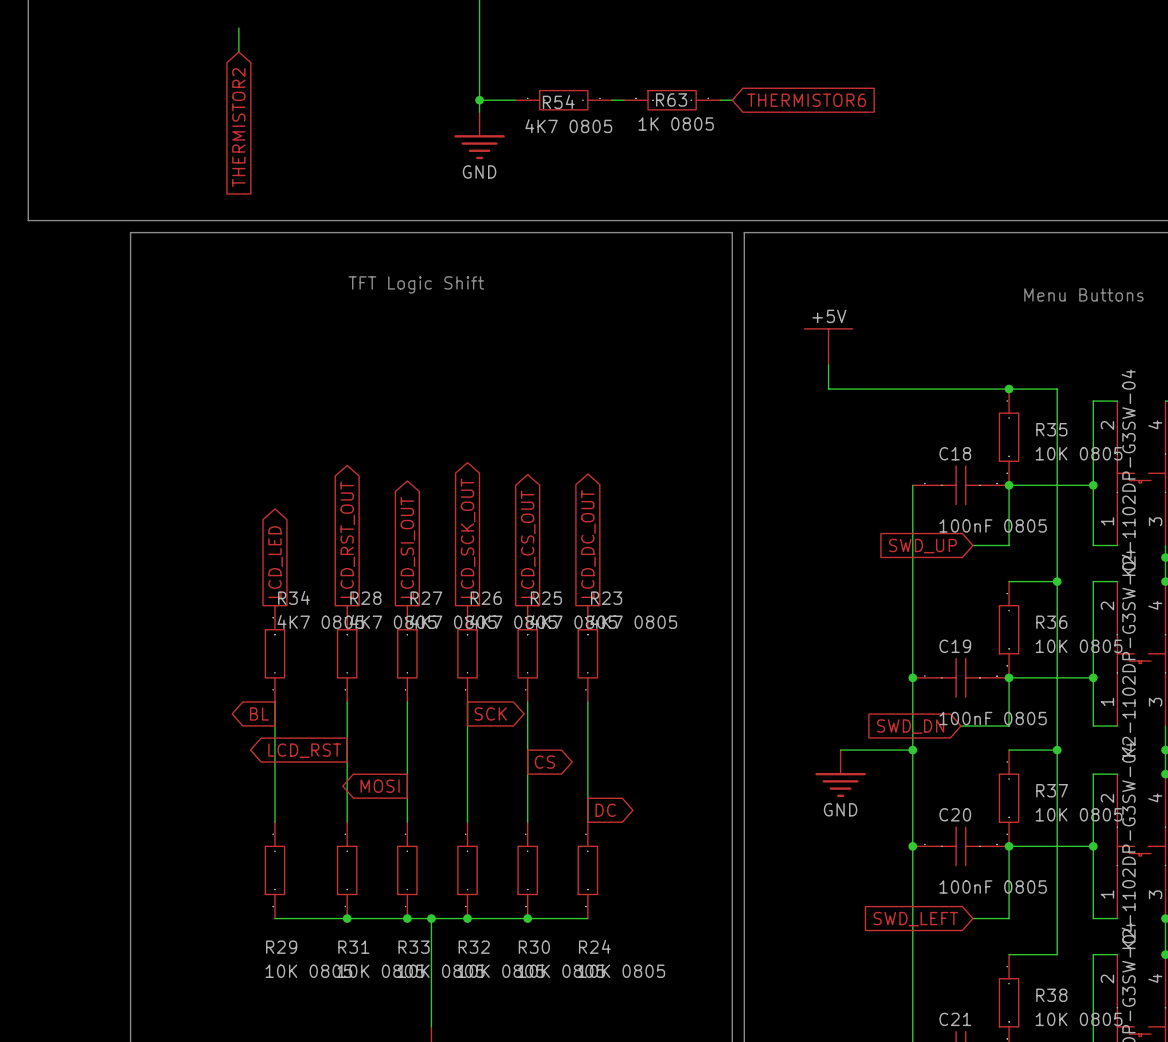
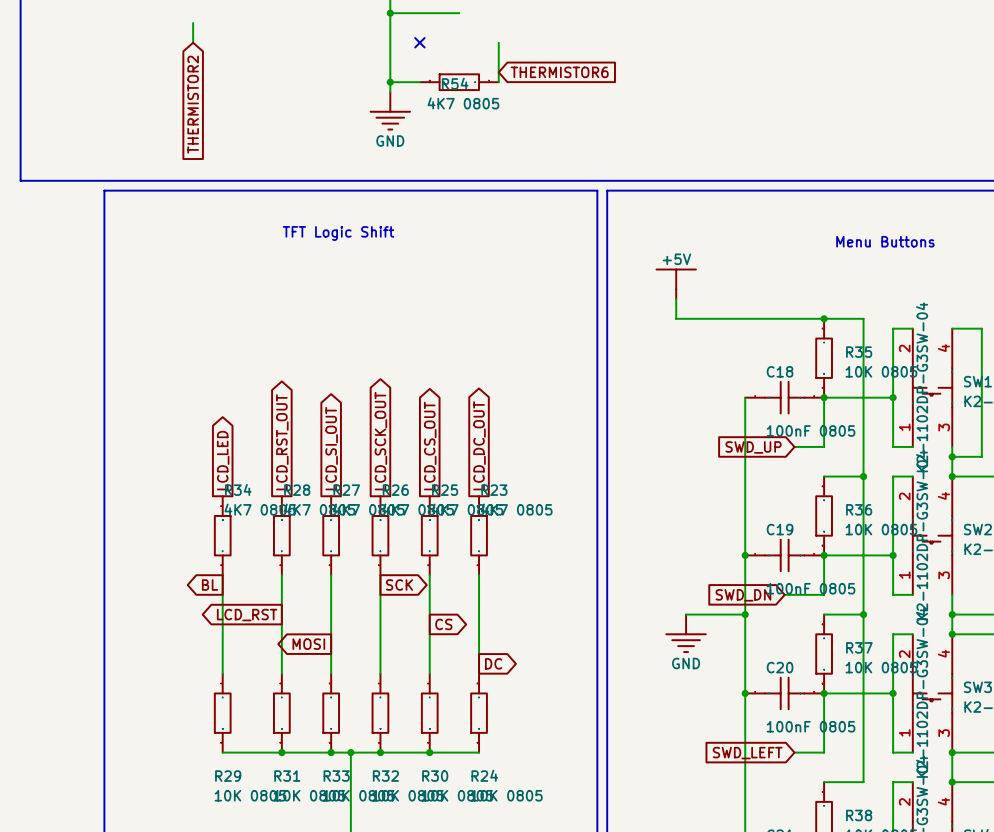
wire: none -> (390, 13) (459, 13)
junction: none -> (390, 13)
no-connect mark: none -> (419, 42)
wire: (611, 100) (623, 100) -> (498, 82) (498, 42)
R63: 1K 0805 (672, 100) -> none
global label position: THERMISTOR6 (806, 100) -> THERMISTOR6 (559, 72)

